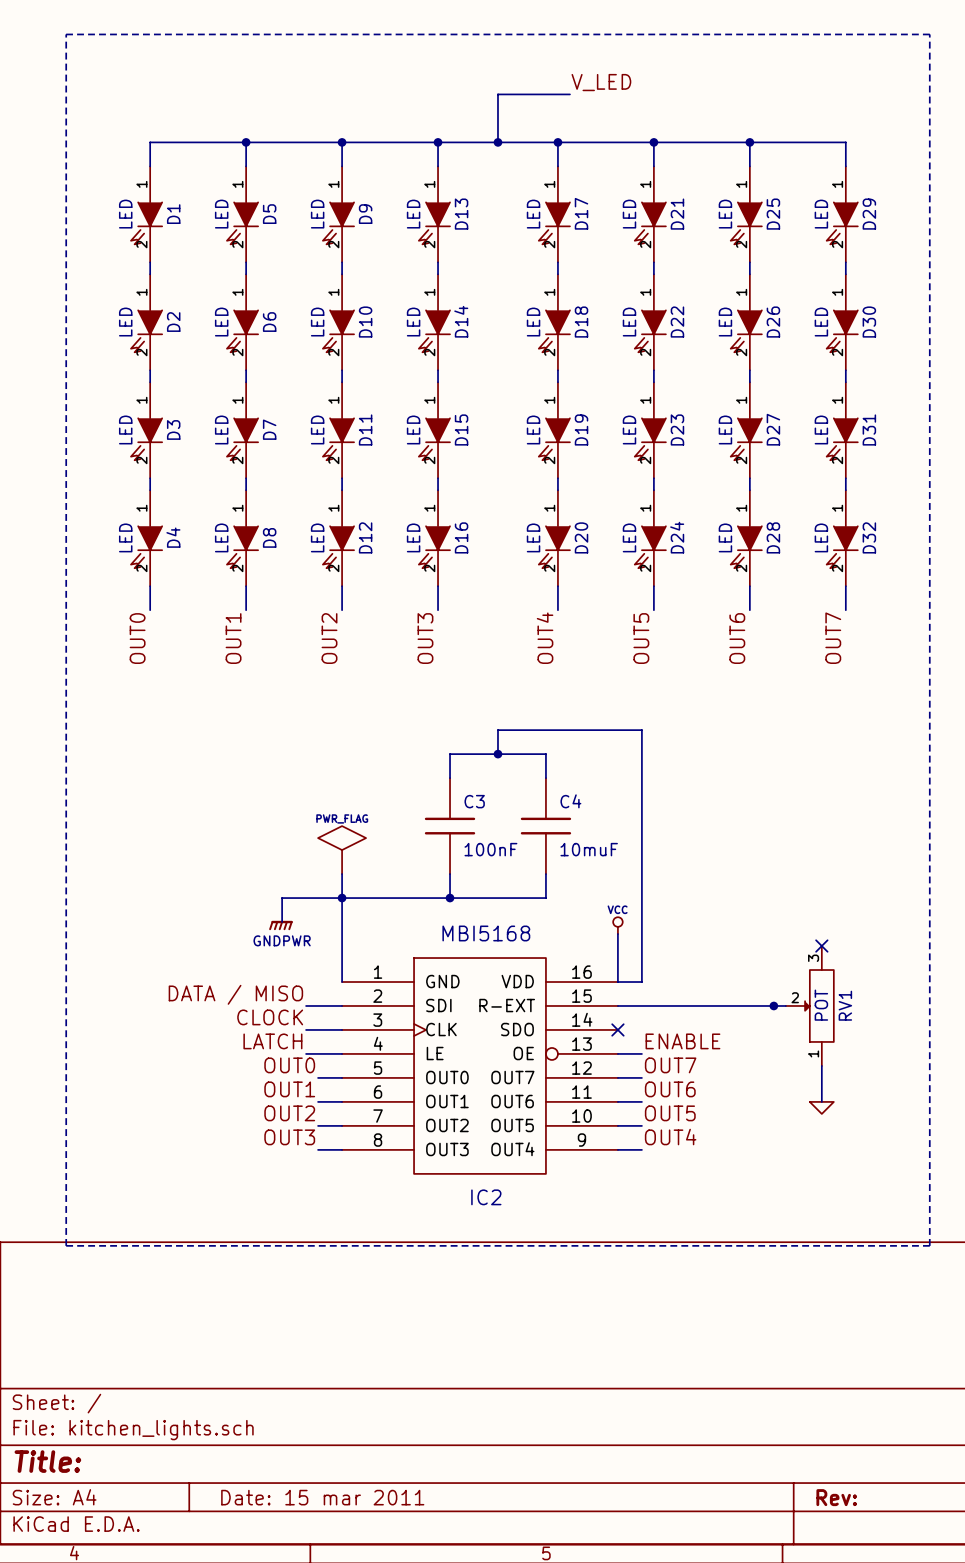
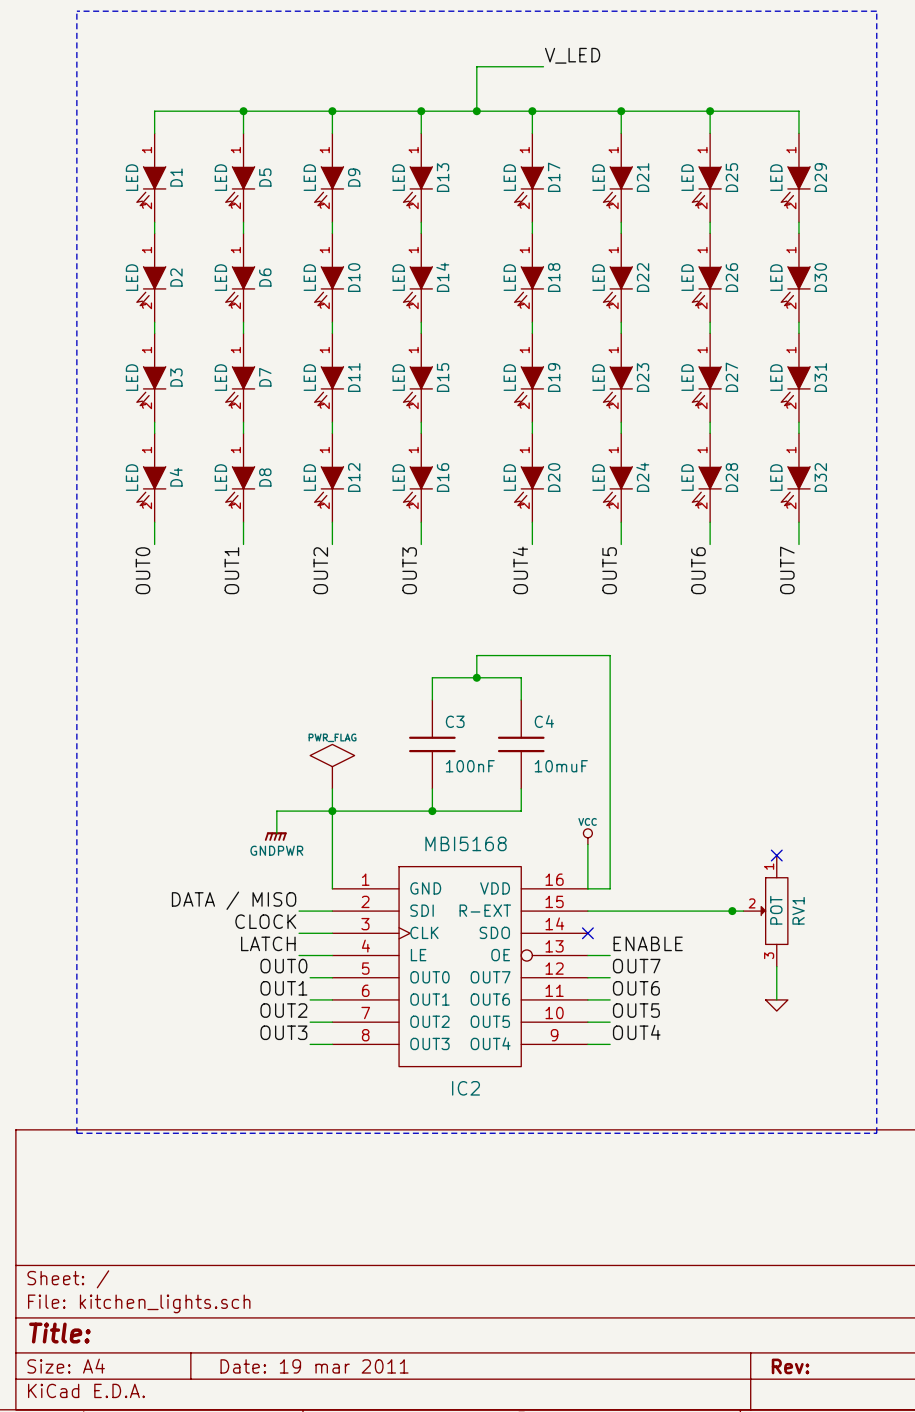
RV1 flip: as is (819, 1005) -> up-down (774, 911)
title block: Date: 15 mar 2011 (322, 1497) -> Date: 19 mar 2011 (314, 1366)

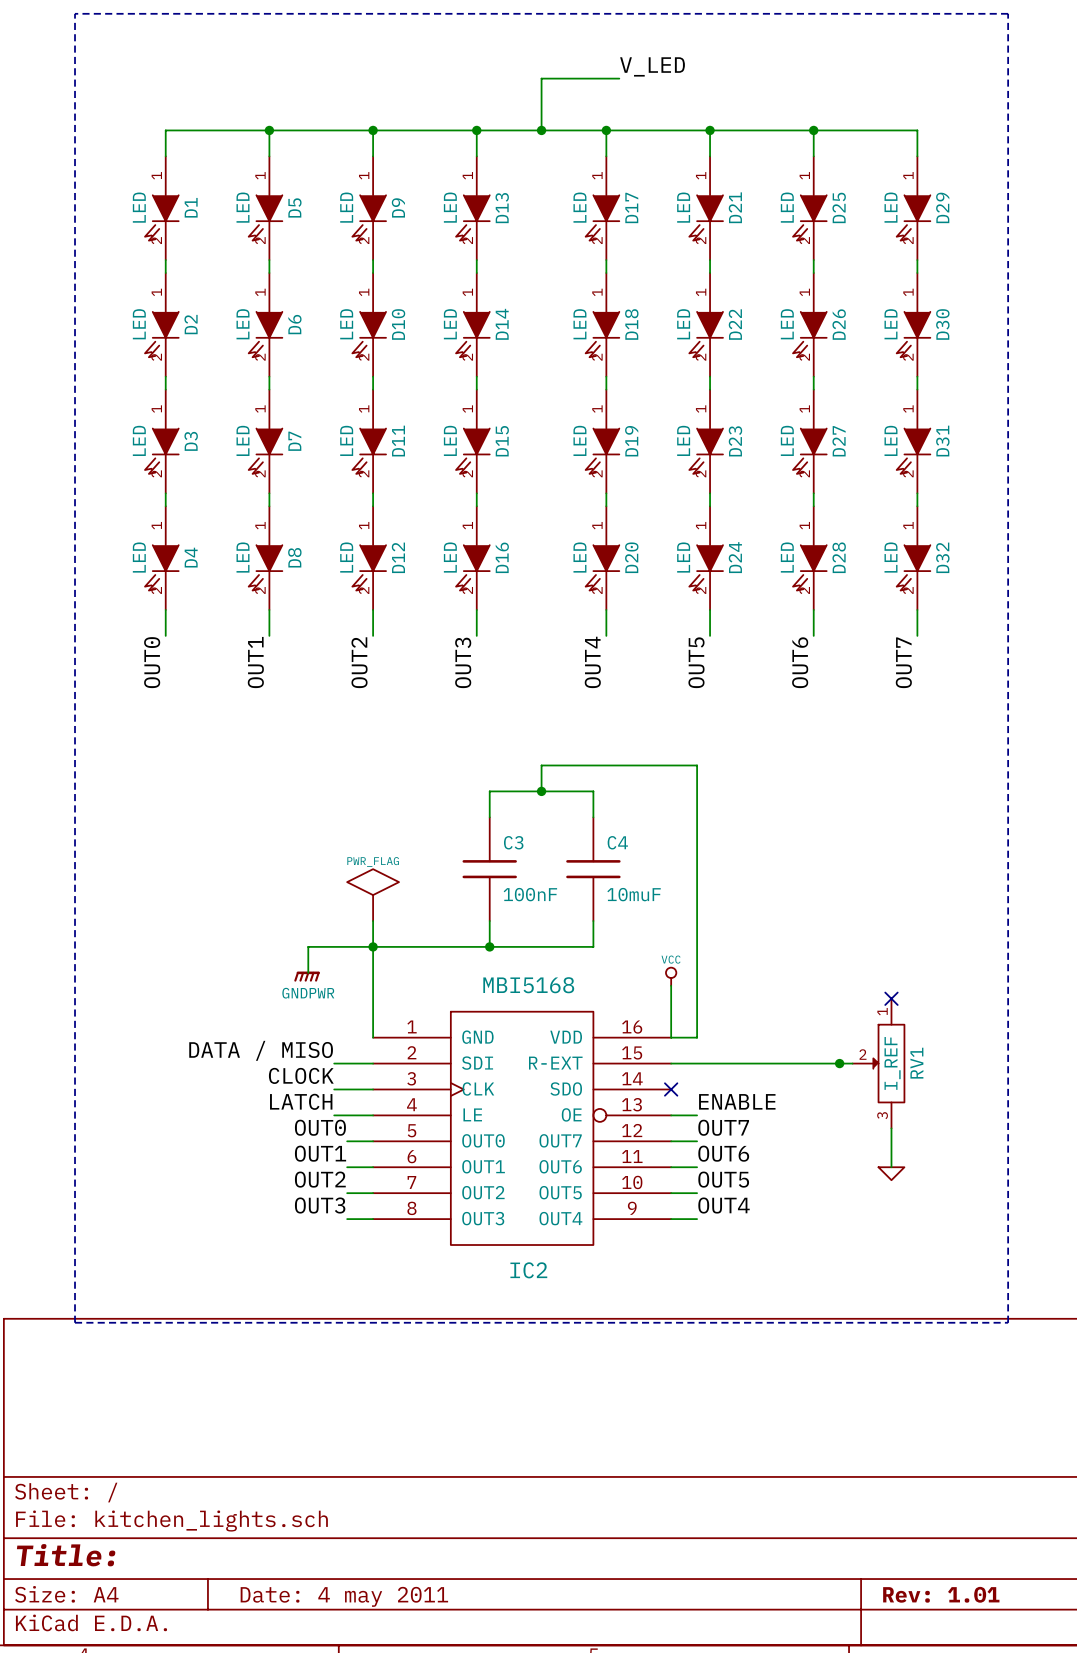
RV1 value: POT (776, 910) -> I_REF (892, 1063)
title block: Date: 19 mar 2011 (314, 1366) -> Date: 4 may 2011 (344, 1596)
title block: Rev: (790, 1366) -> Rev: 1.01 (941, 1594)

